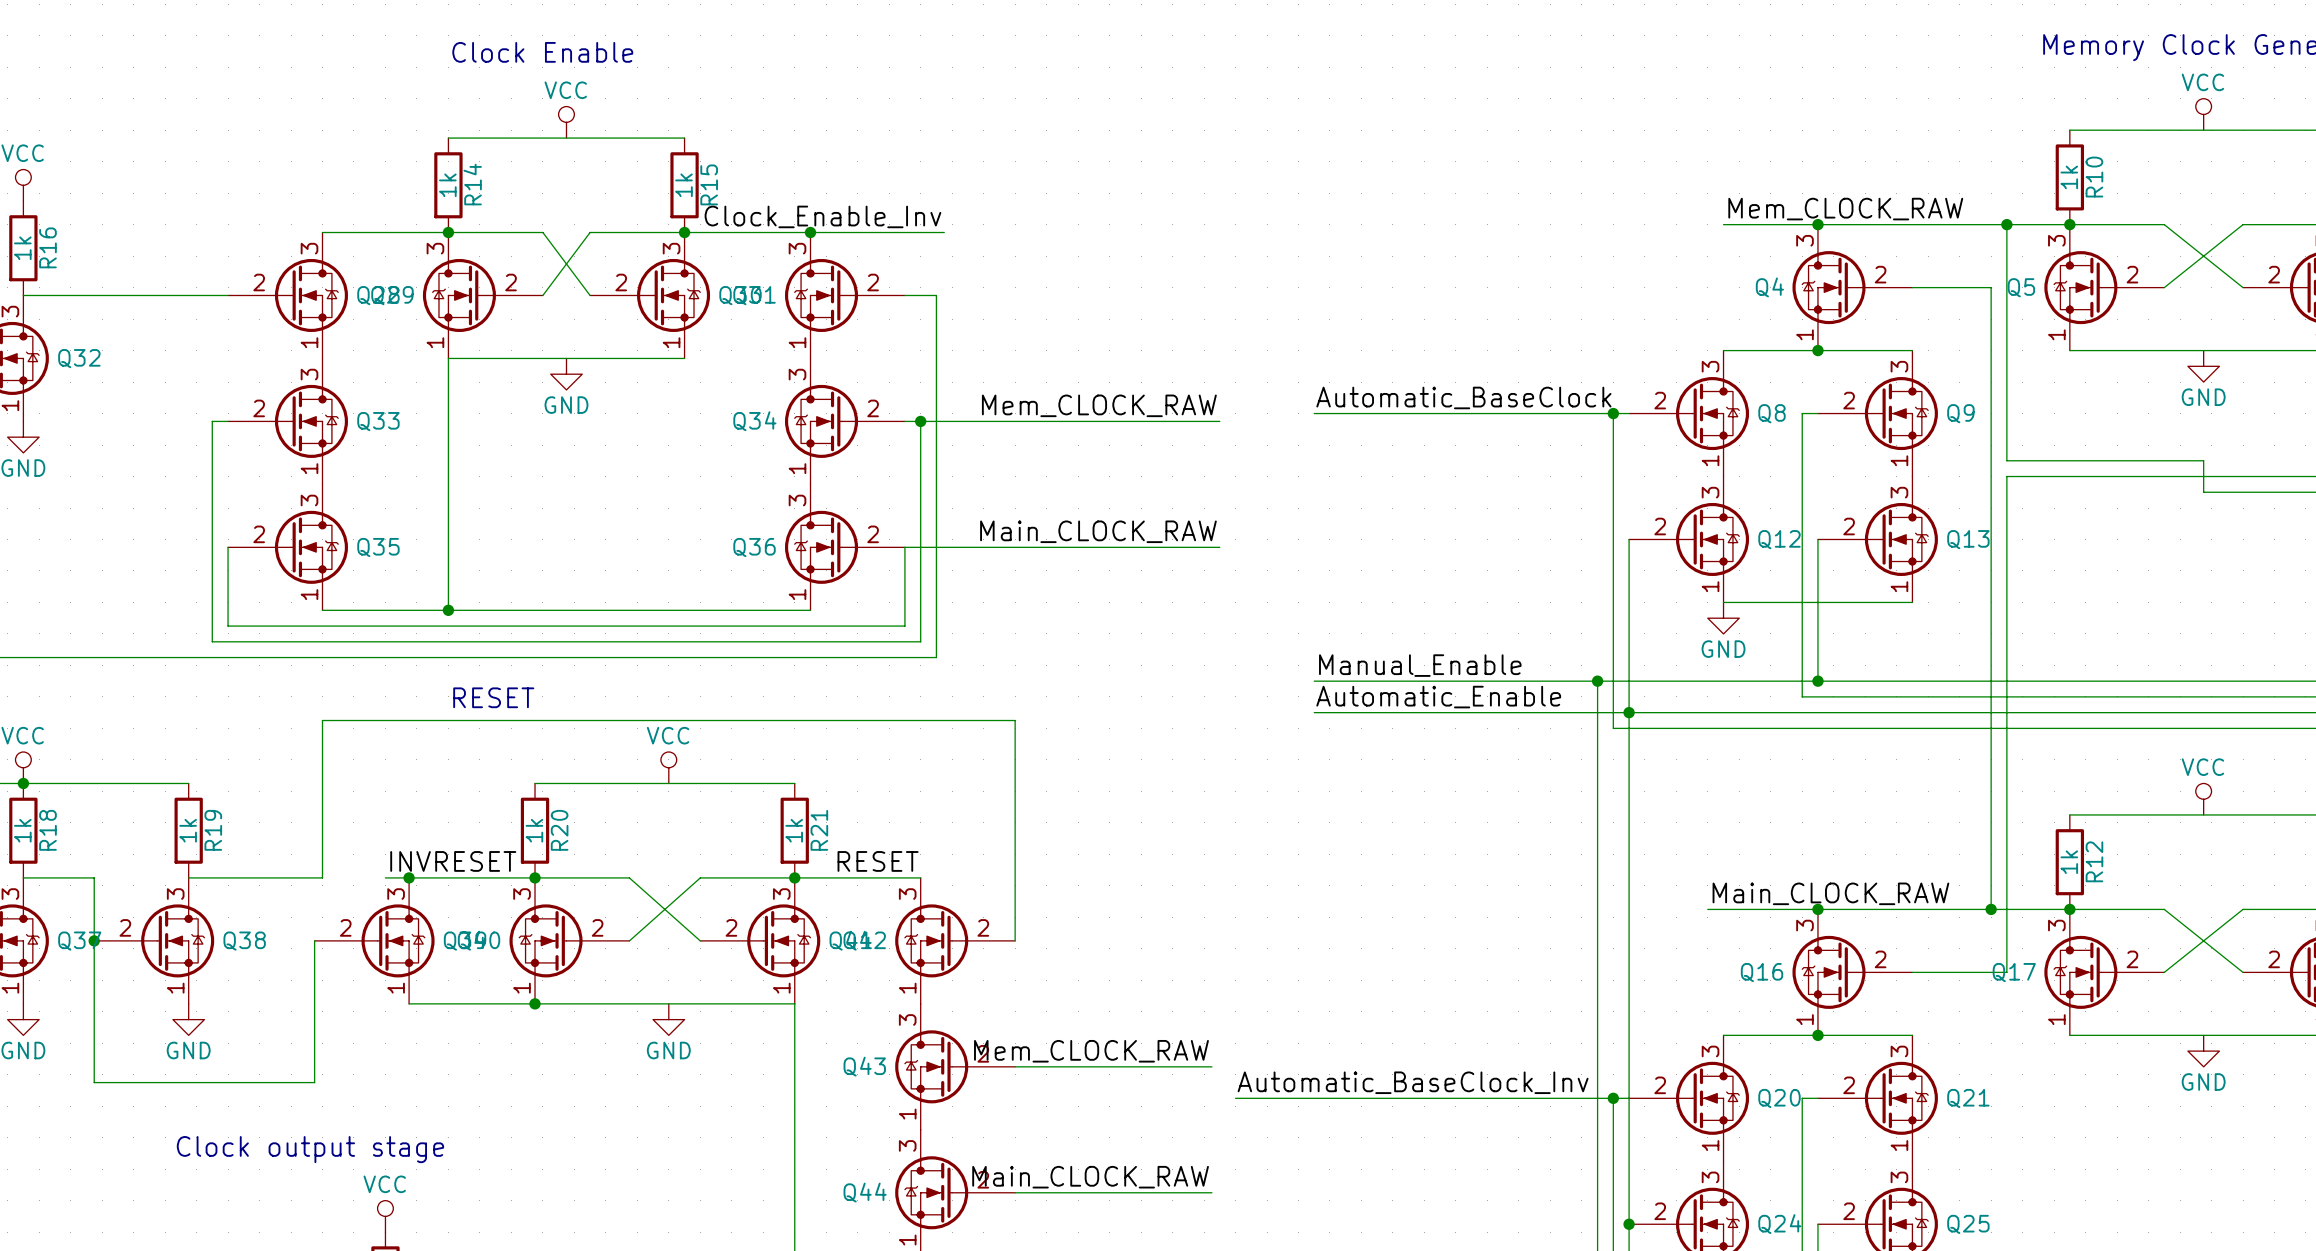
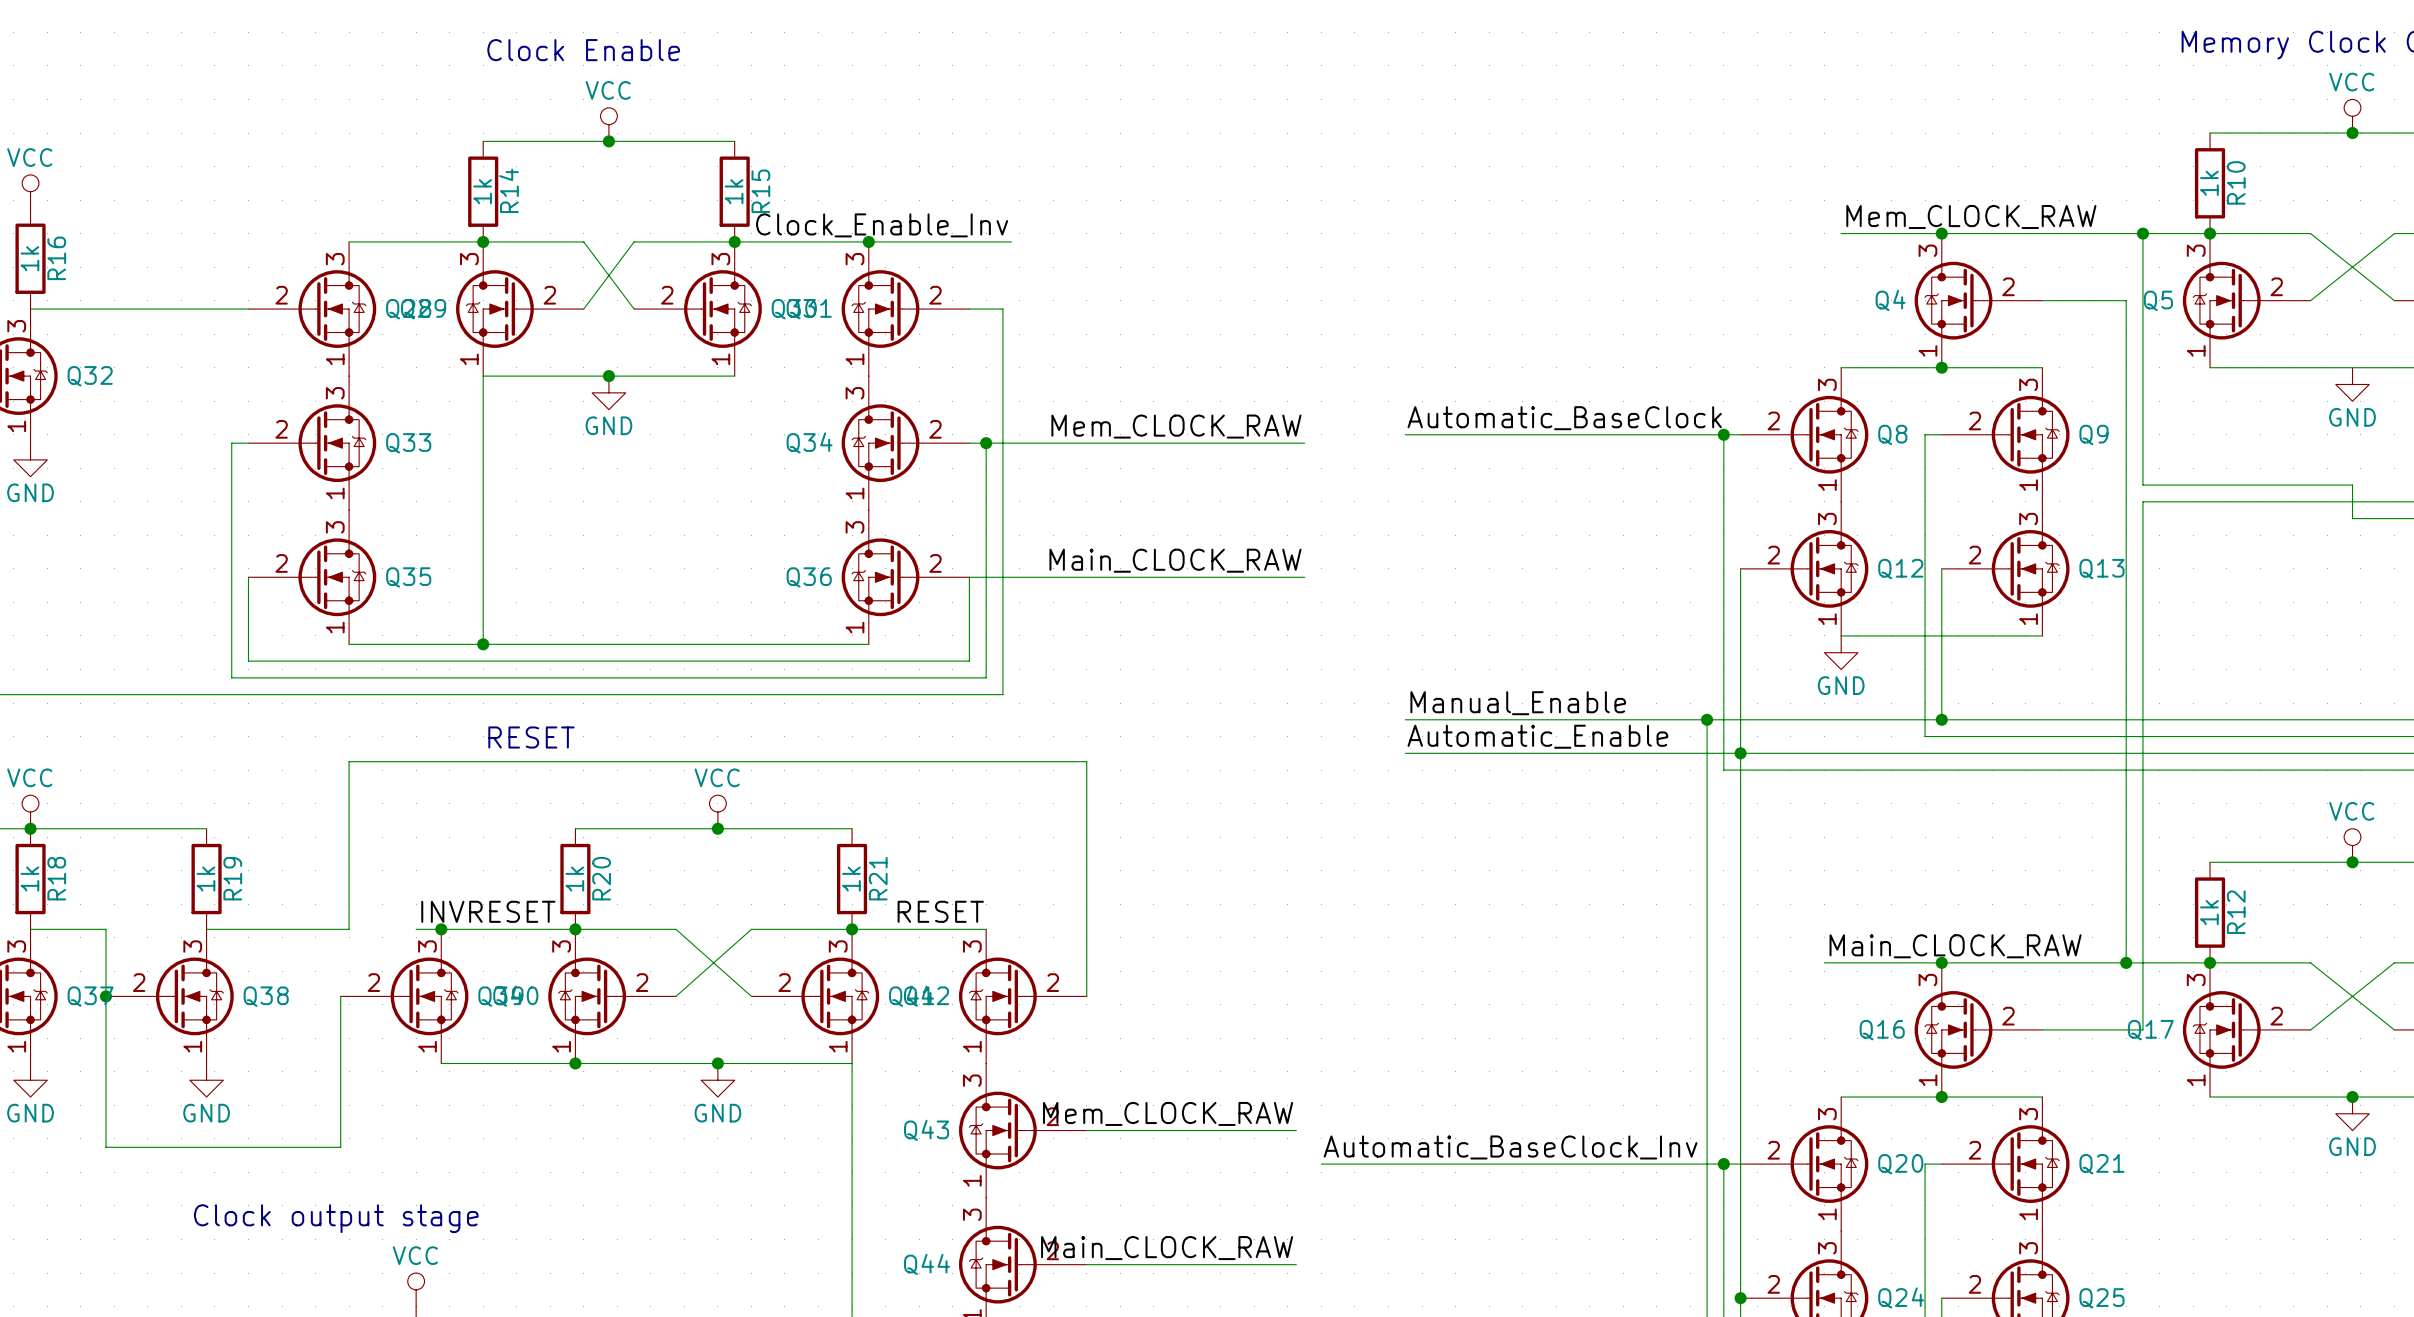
junction: none -> (2352, 133)
junction: none -> (608, 141)
junction: none -> (608, 376)
junction: none -> (717, 828)
junction: none -> (2352, 862)
junction: none -> (717, 1063)
junction: none -> (2352, 1097)

